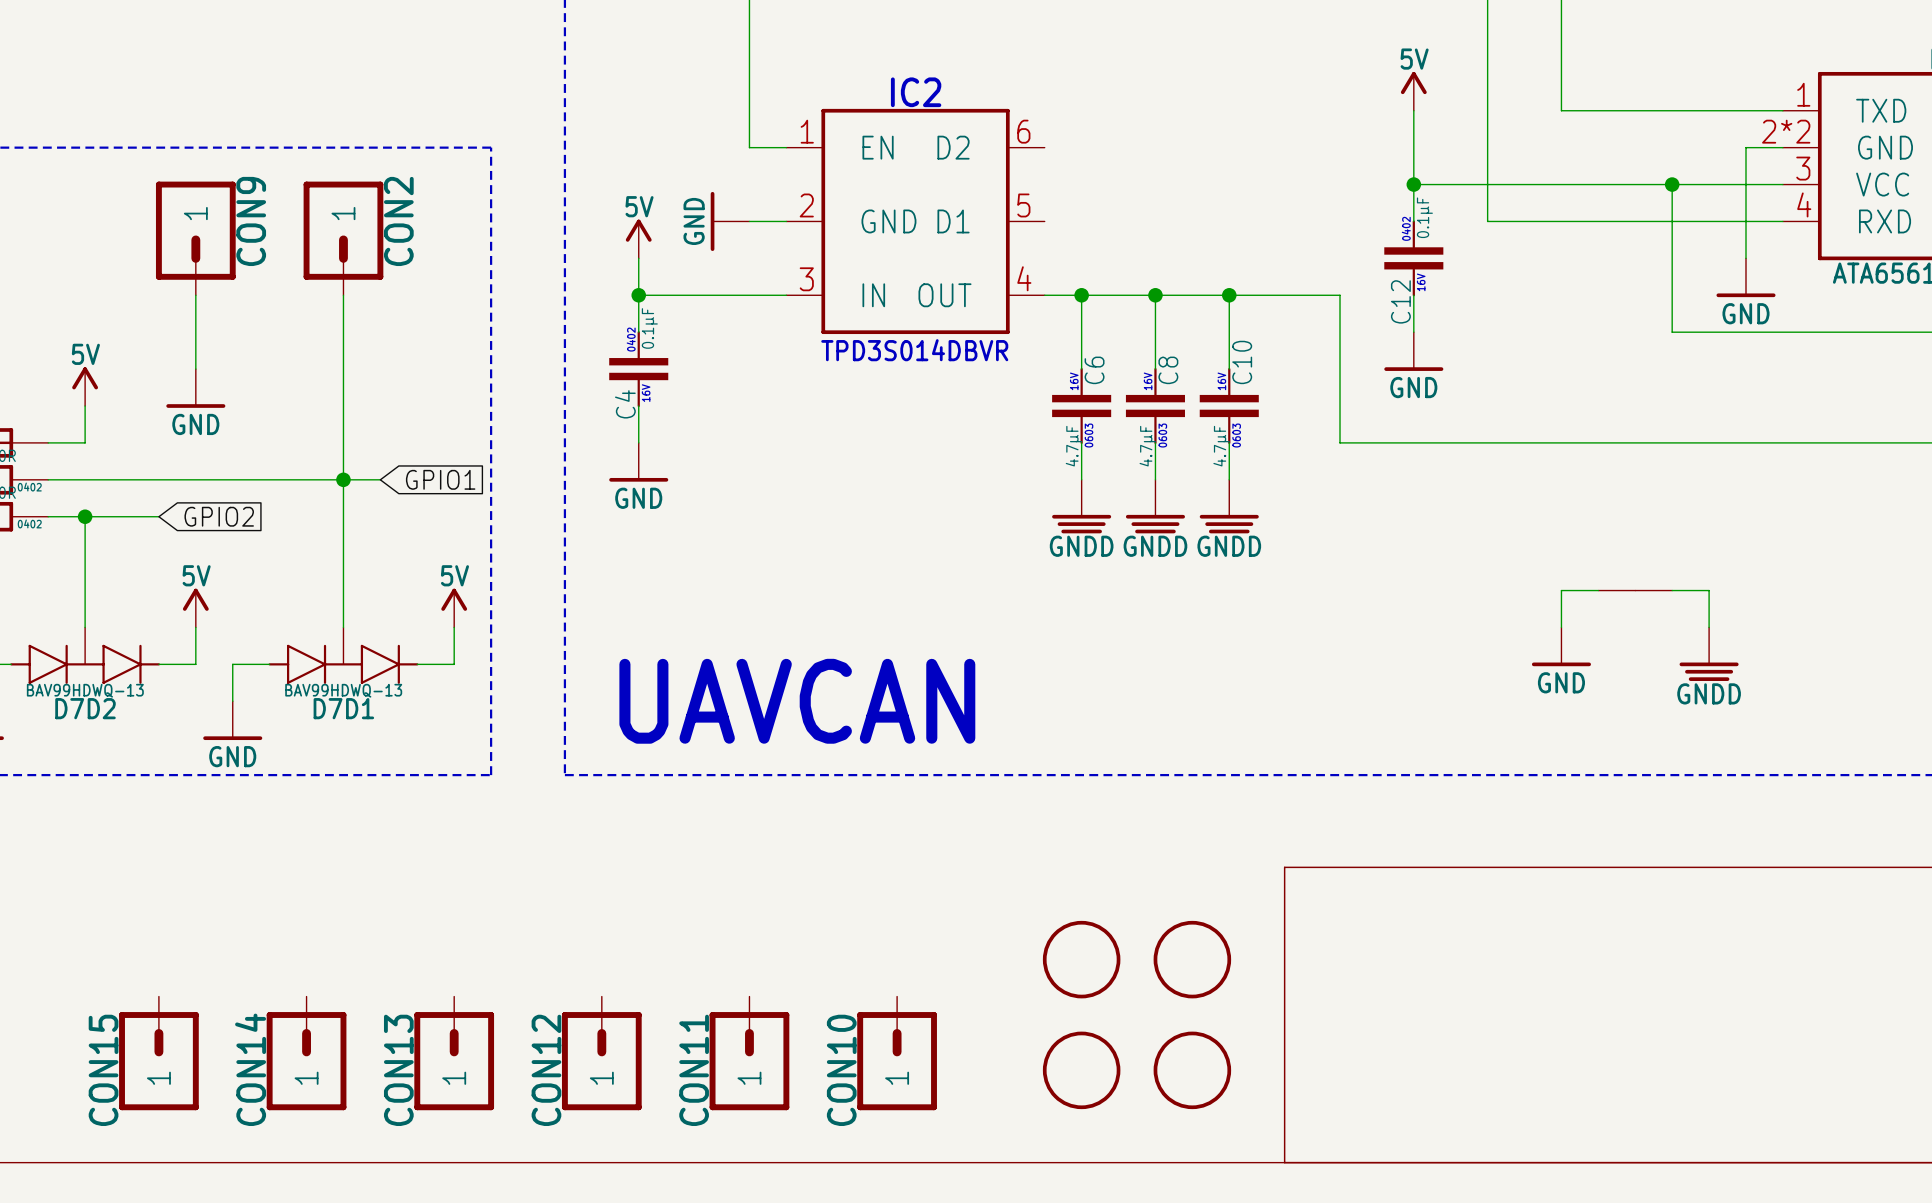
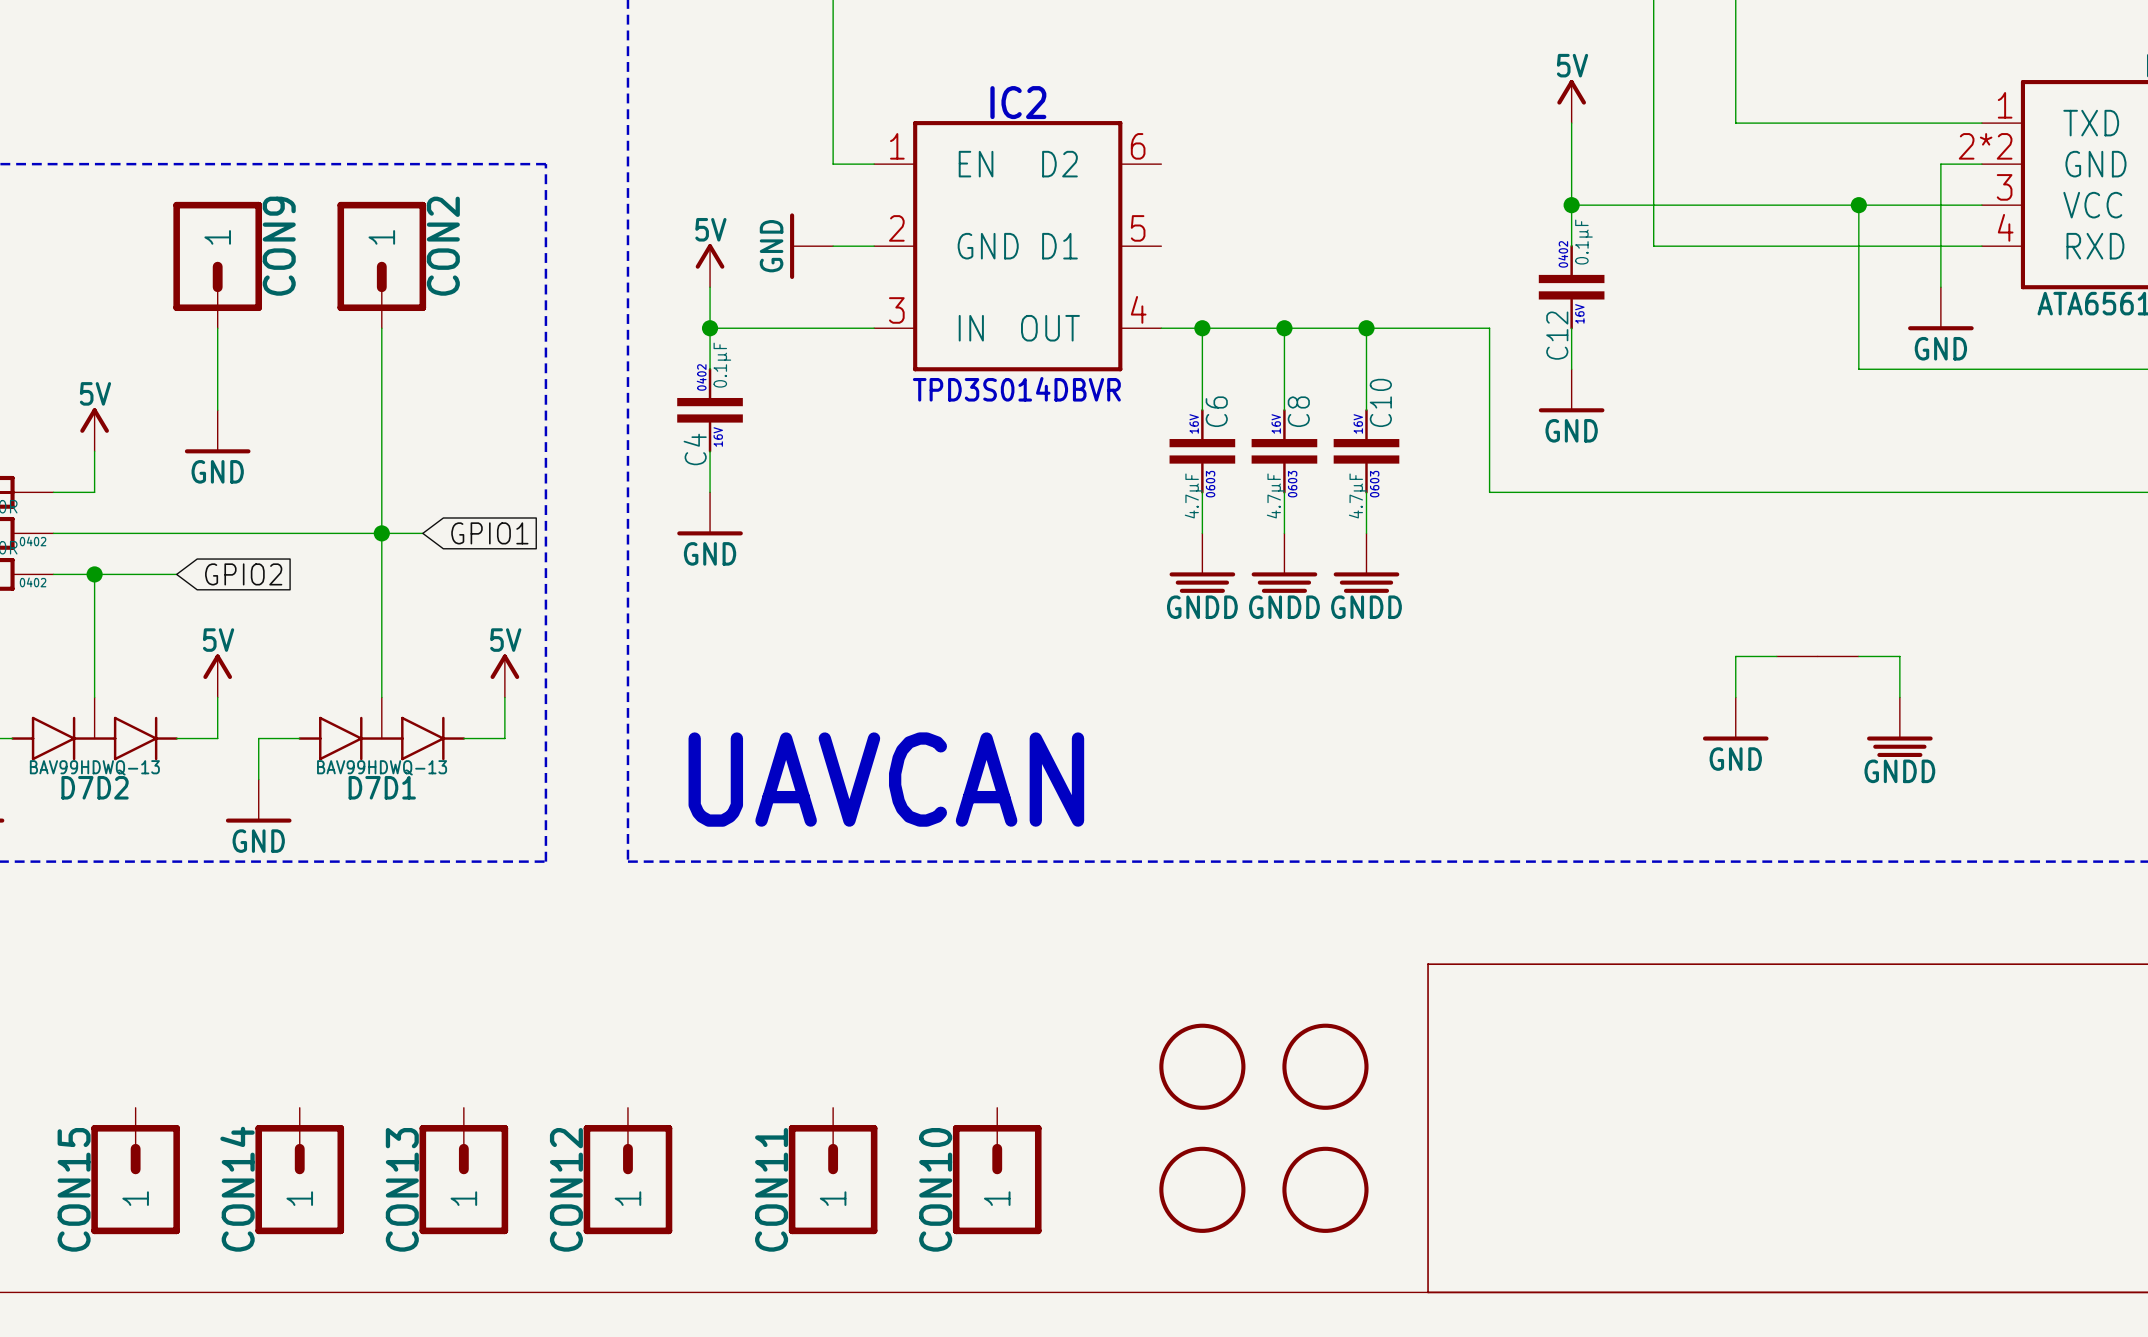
CON15 position: (158, 1053) -> (135, 1170)
CON14 position: (306, 1053) -> (299, 1170)
CON13 position: (454, 1053) -> (463, 1170)
CON12 position: (601, 1053) -> (627, 1170)

